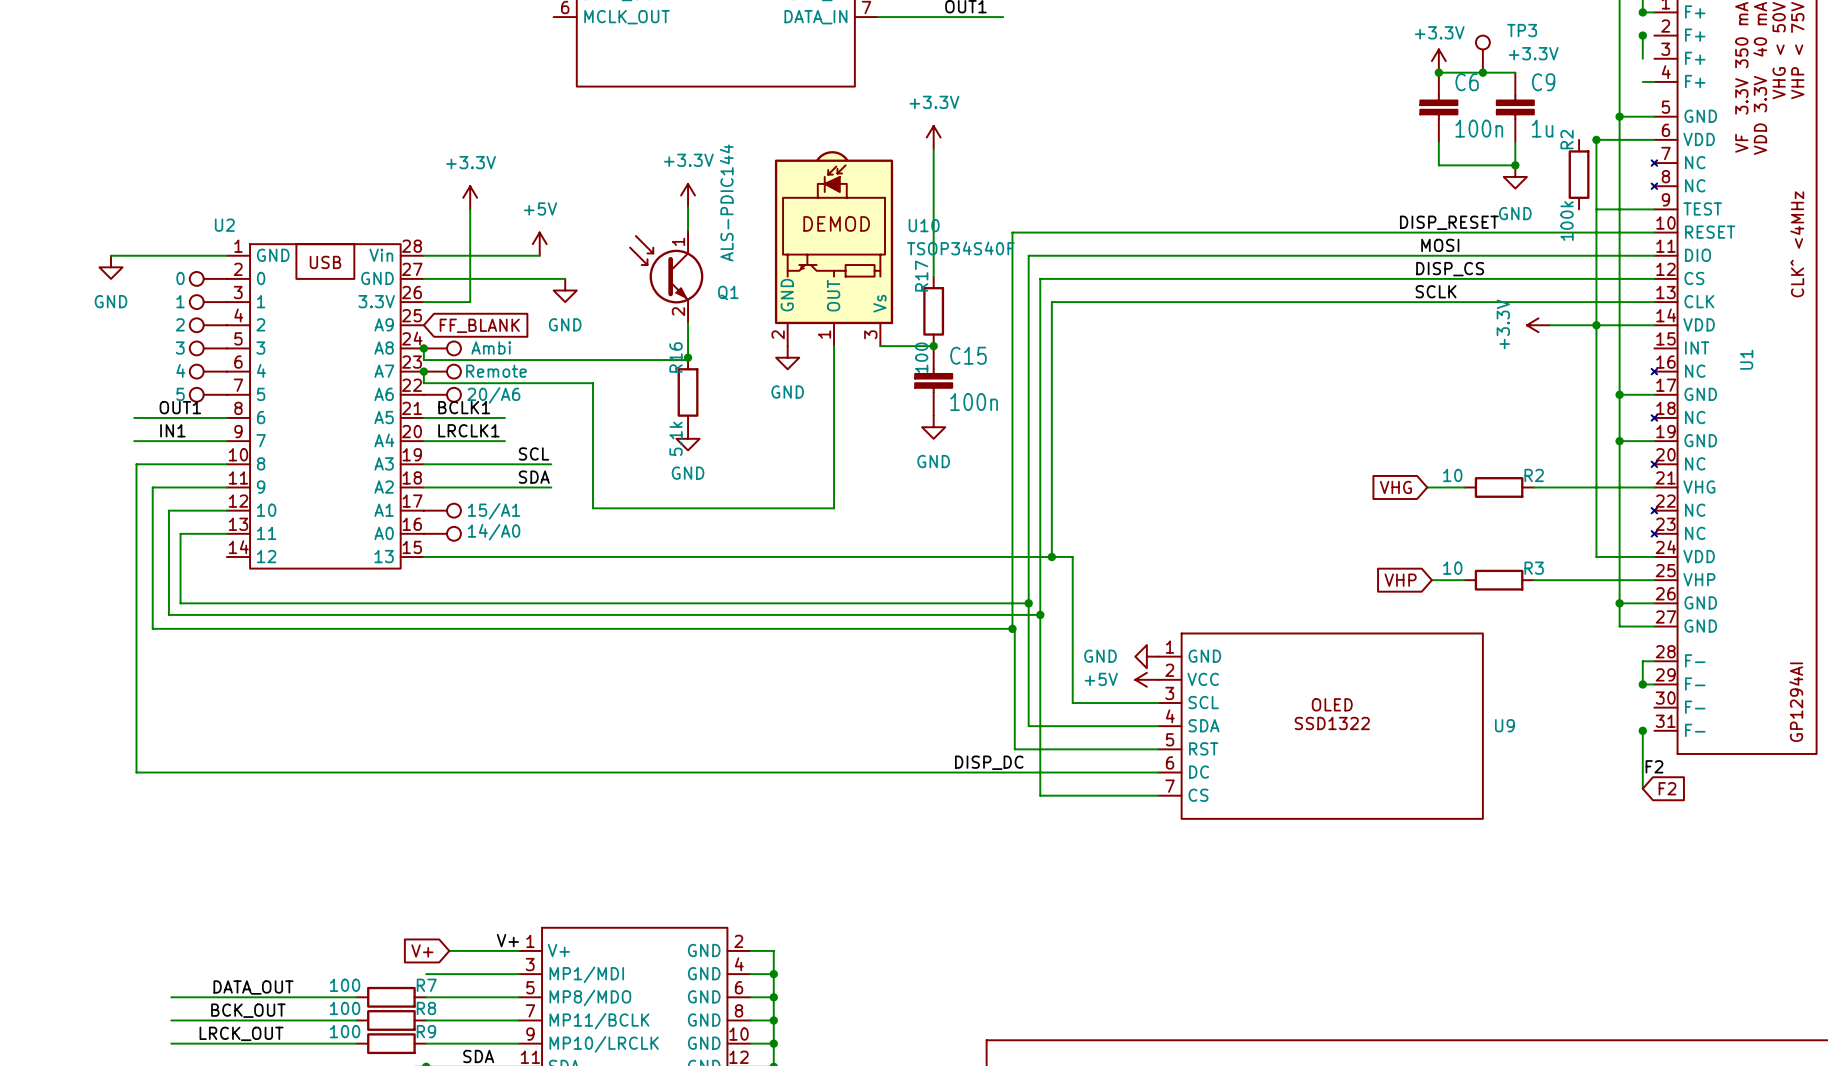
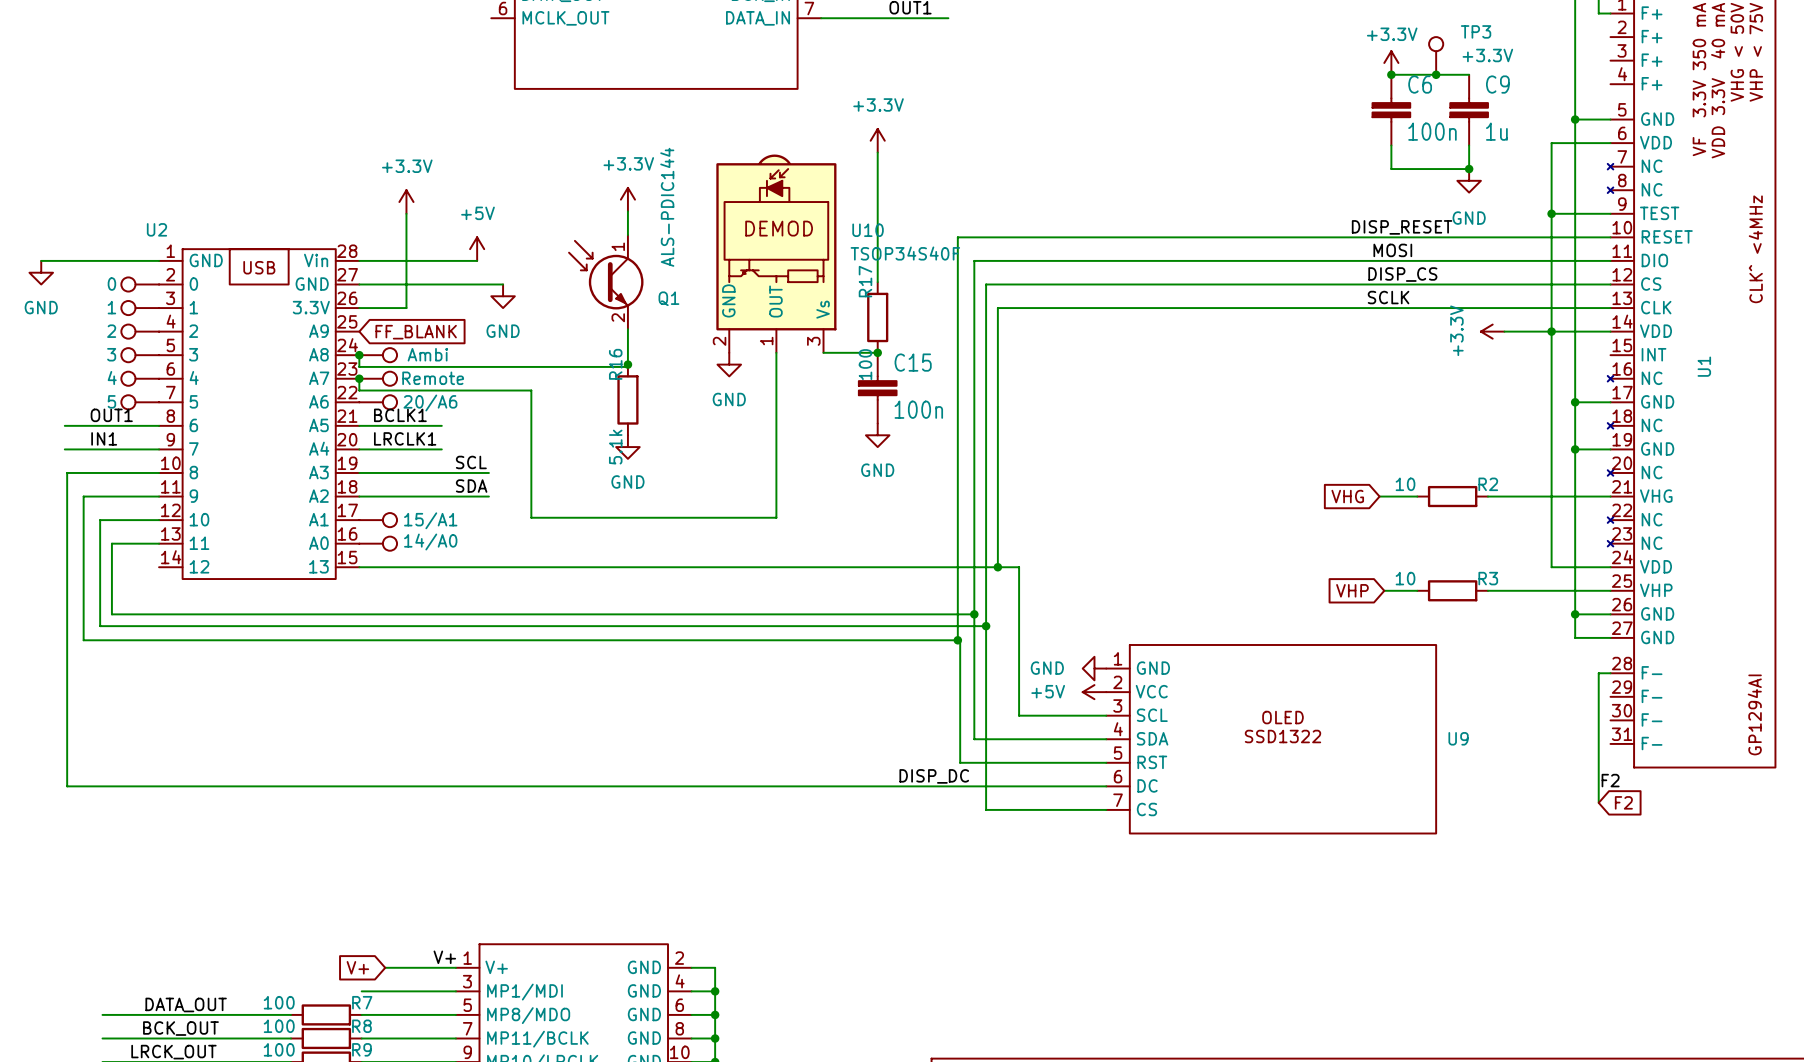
junction: (1642, 12) -> none
wire: (1642, 35) (1642, 58) -> none
junction: (1642, 35) -> none
wire: (1642, 81) (1654, 81) -> none
junction: (1596, 139) -> none
R2: 100k (1579, 174) -> none
junction: none -> (1551, 213)
wire: (1642, 684) (1654, 684) -> (1598, 696) (1598, 743)
junction: (1642, 684) -> none
junction: (1642, 730) -> none

